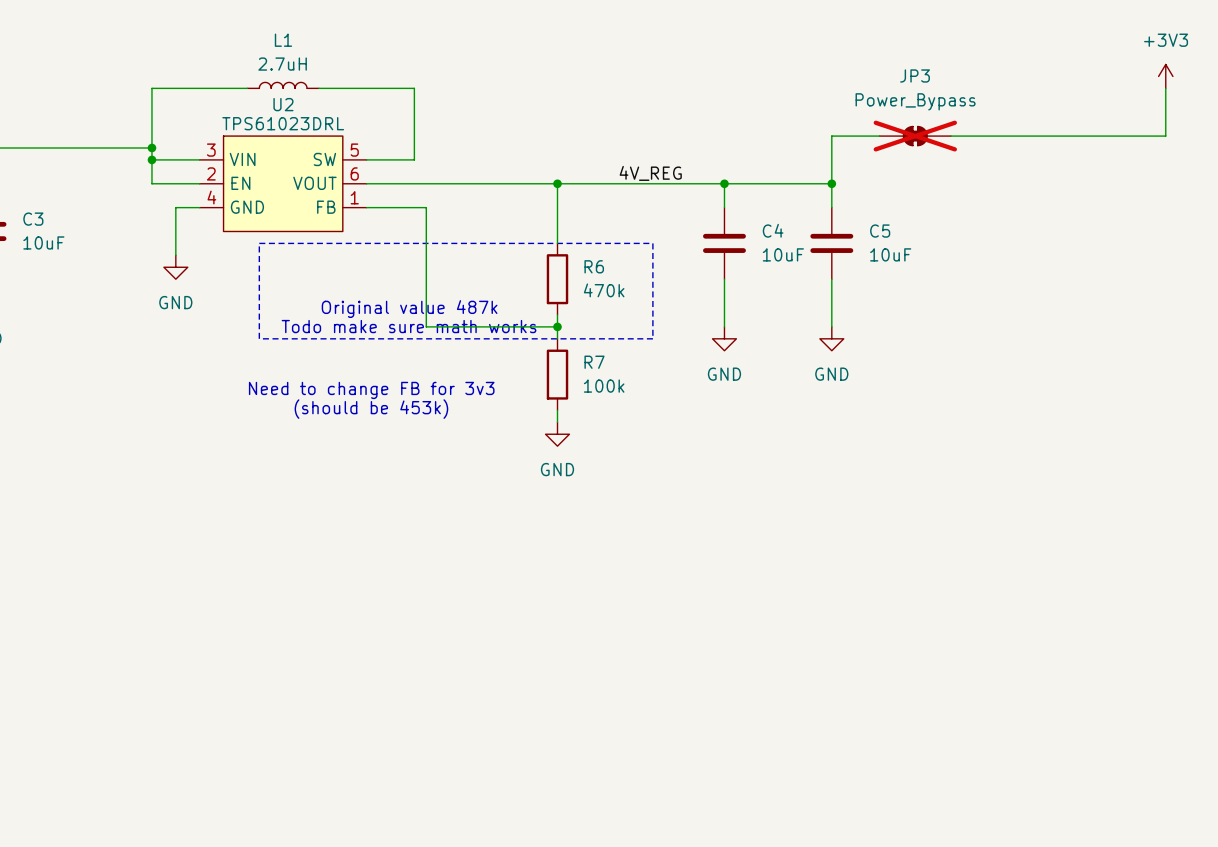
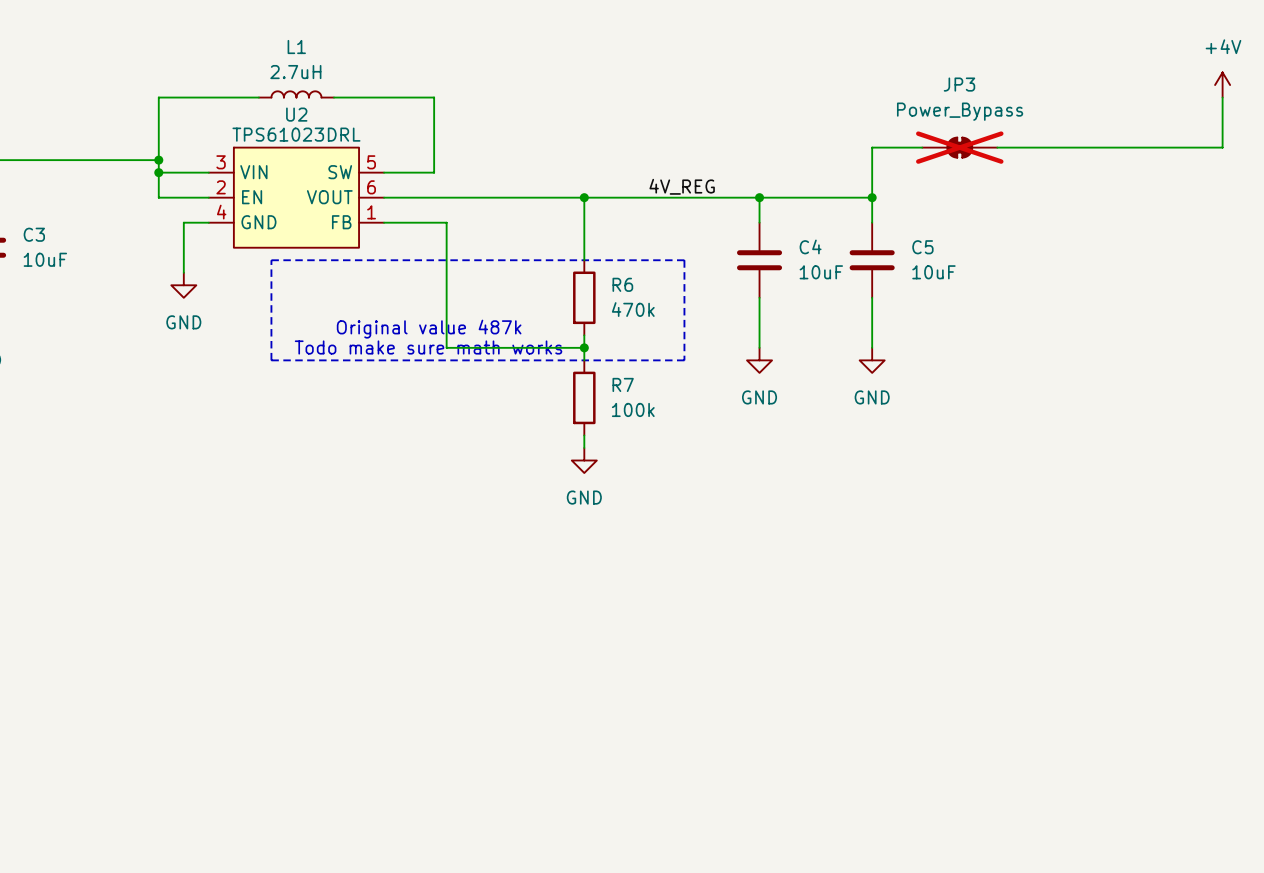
power symbol: +3V3 (1165, 76) -> +4V (1222, 85)
text: Need to change FB for 3v3 (371, 390) -> none
text: (should be 453k) (371, 409) -> none

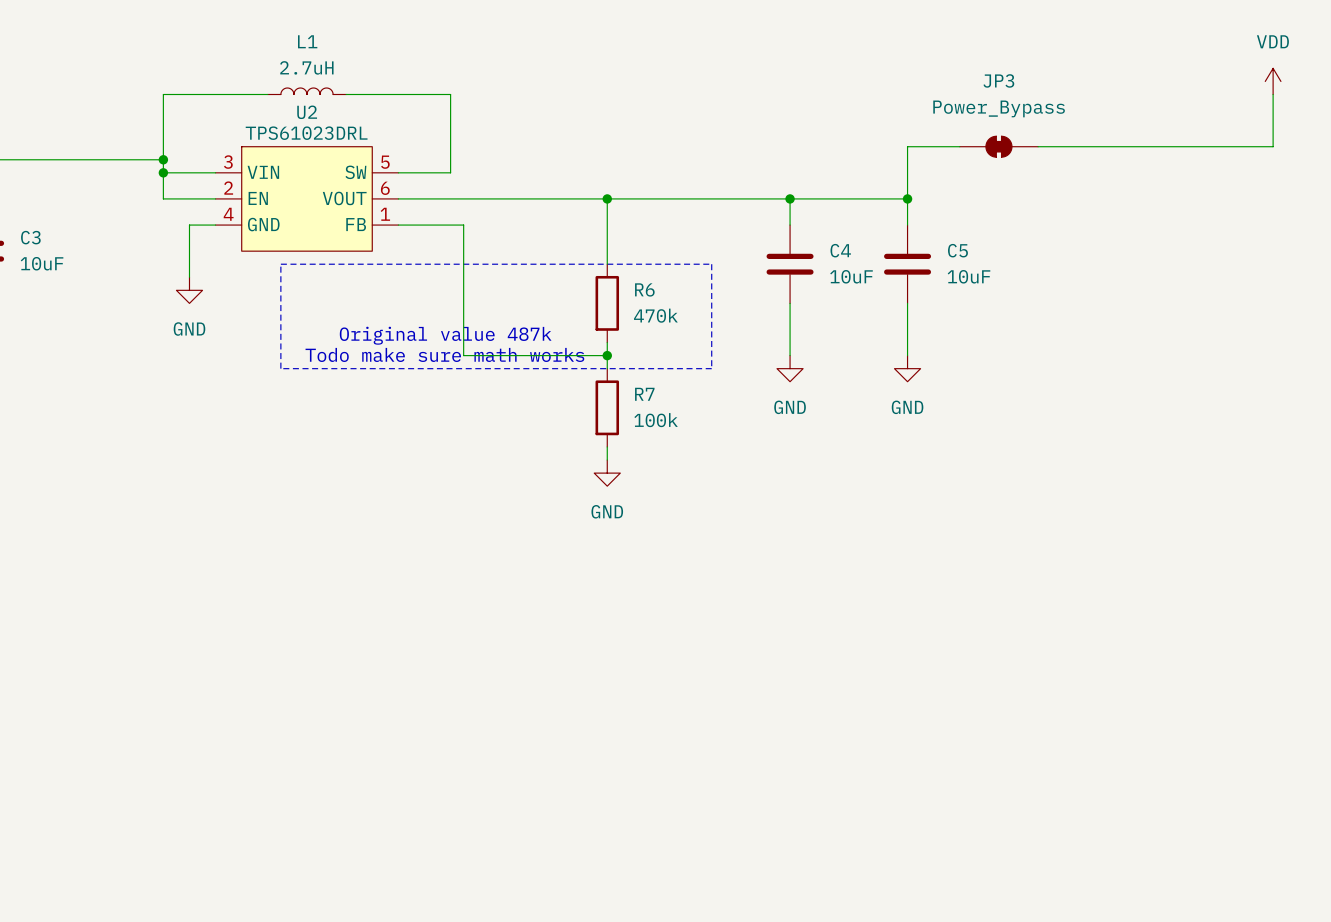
power symbol: +4V (1222, 85) -> VDD (1273, 81)
JP3 do-not-place cross: (959, 147) -> none
label: 4V_REG (682, 186) -> none

